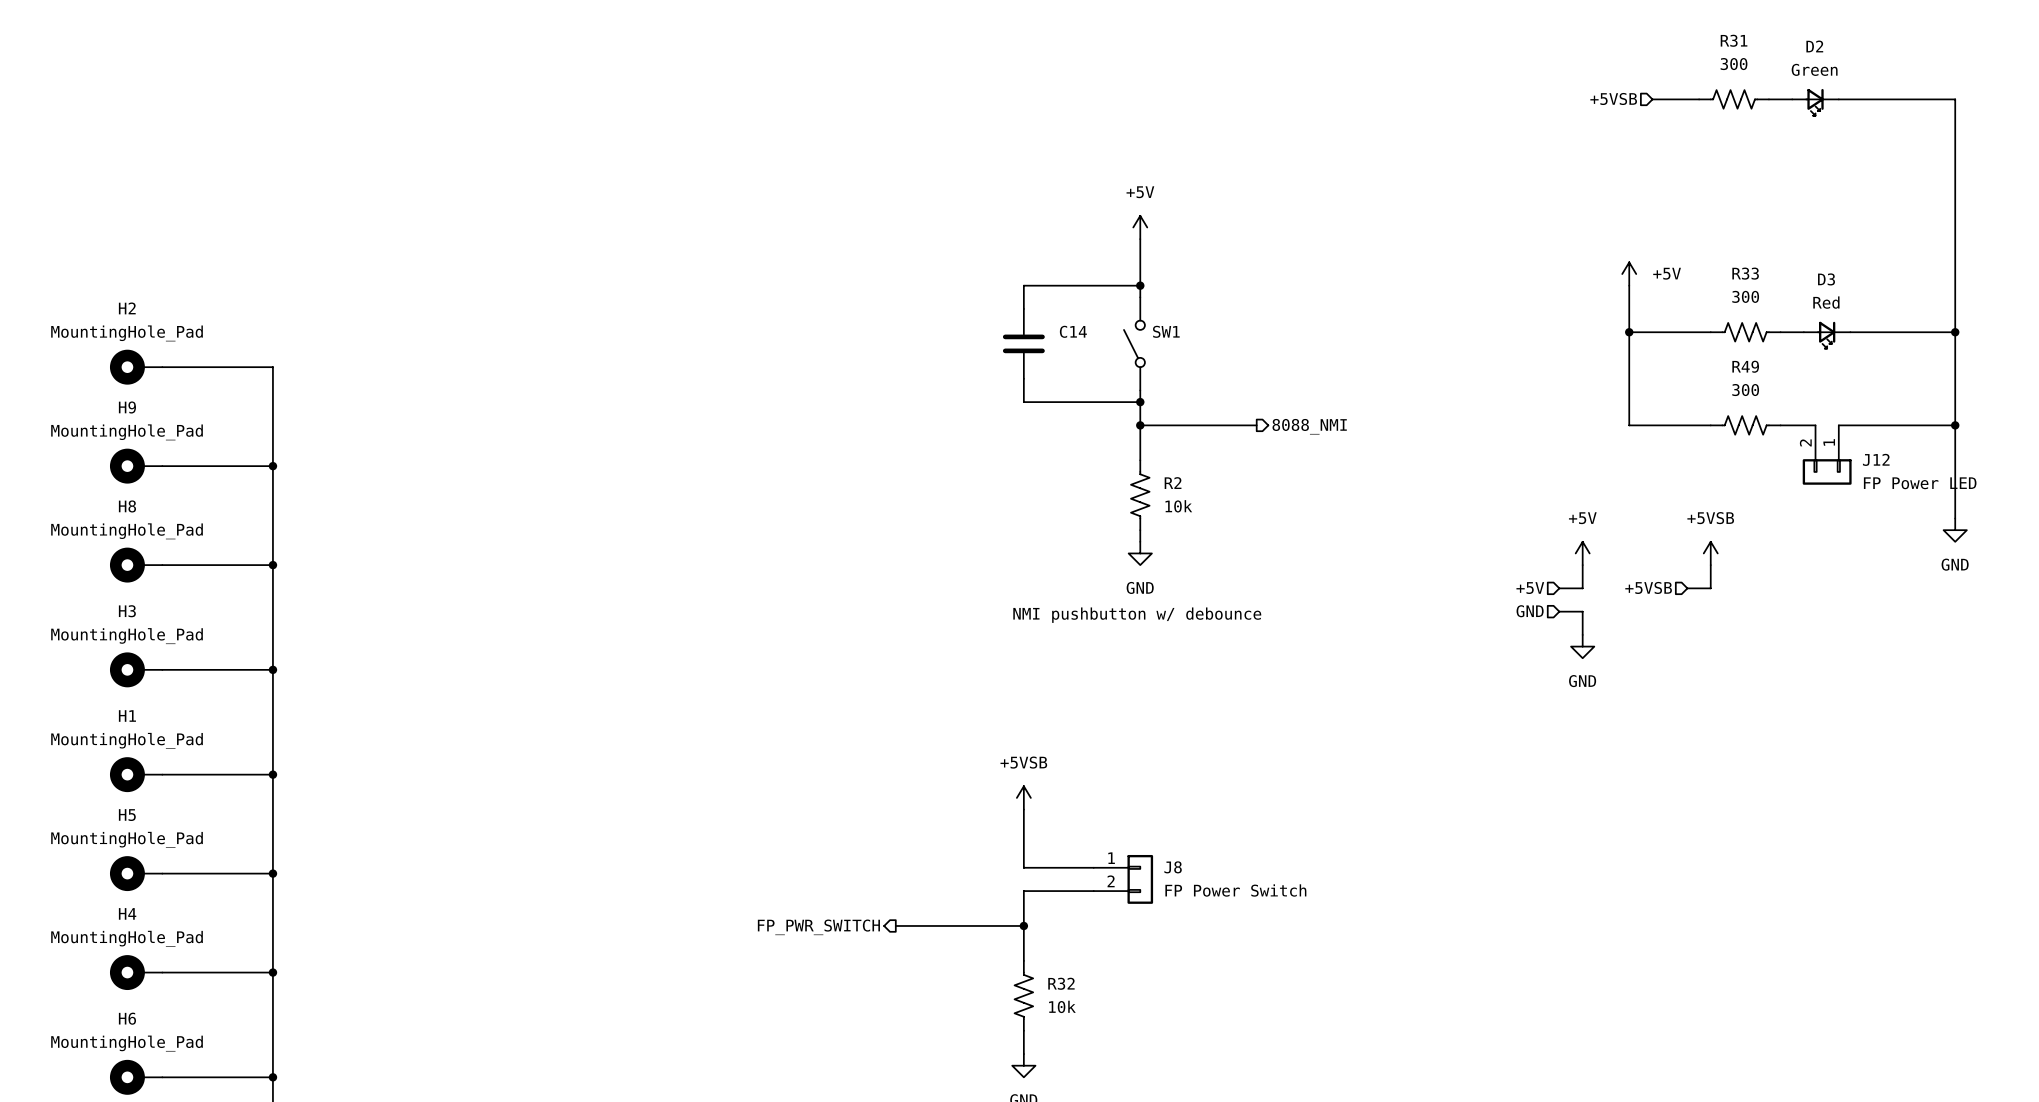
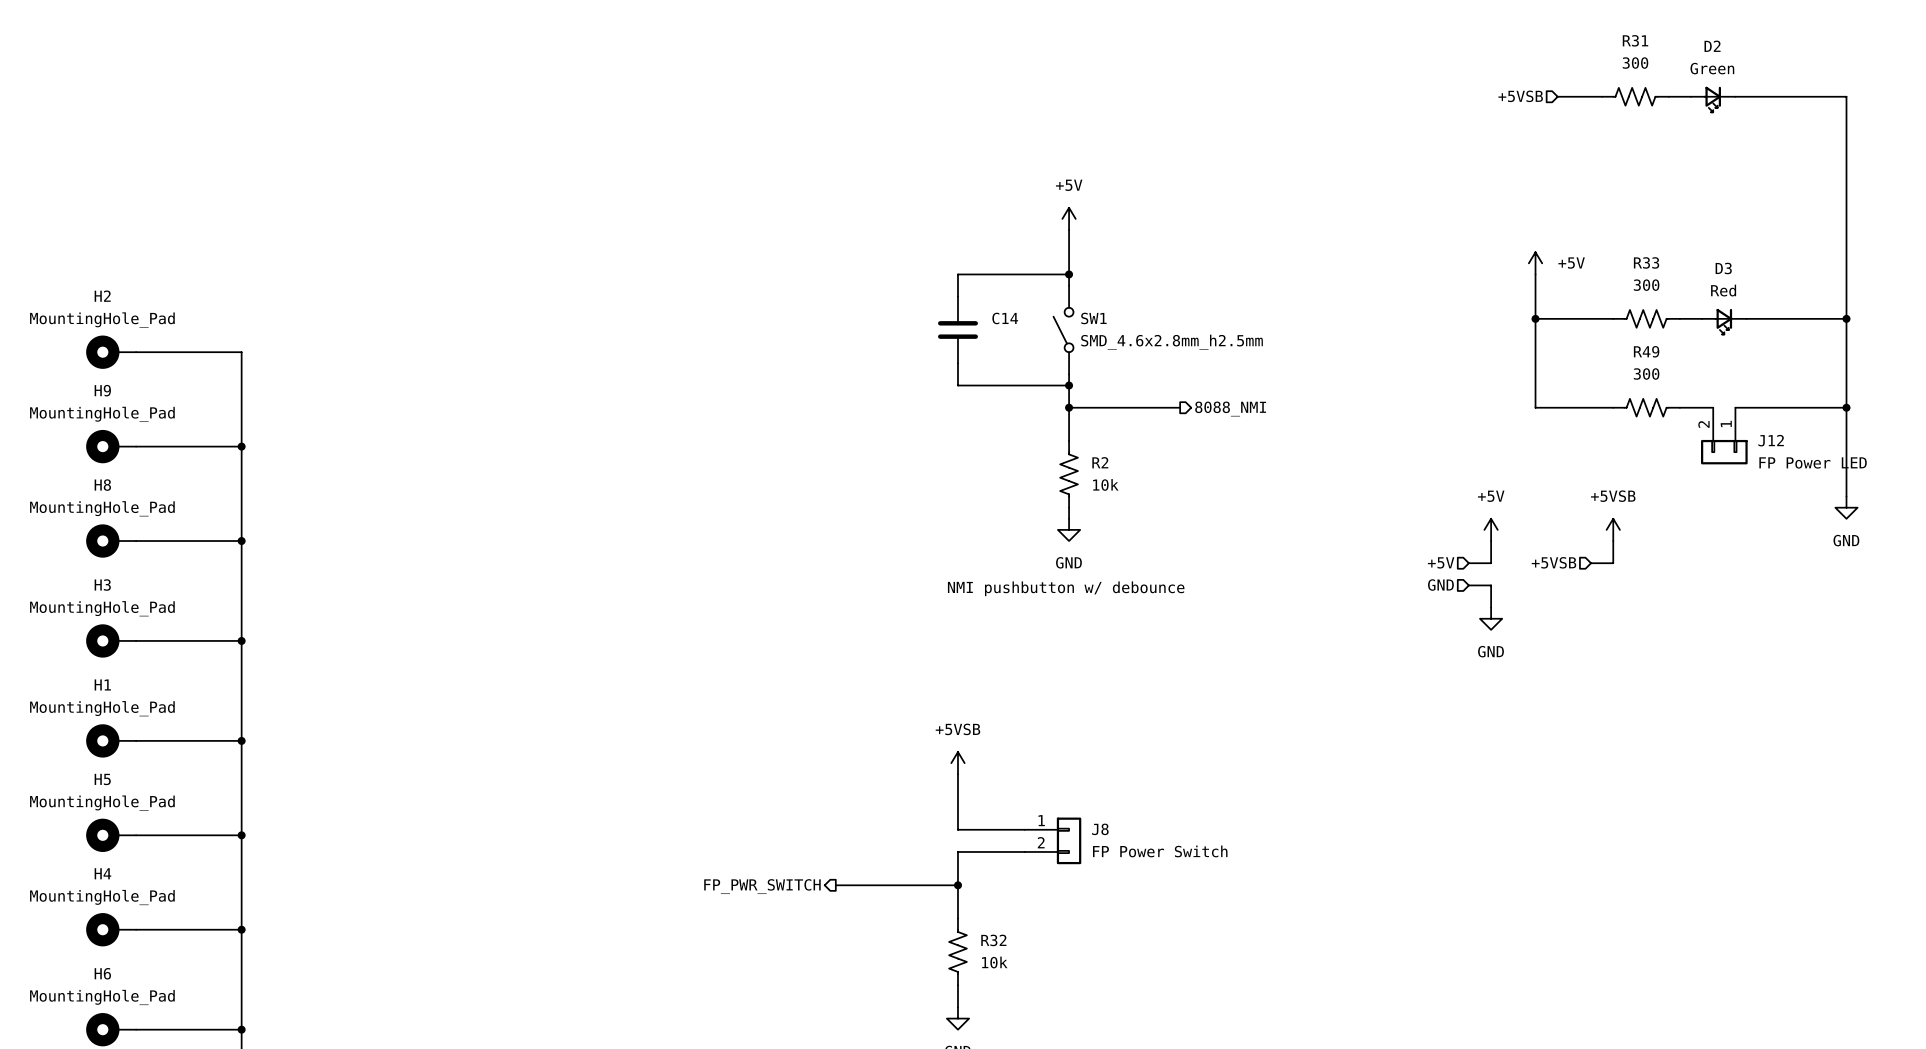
SW1 value: none -> SMD_4.6x2.8mm_h2.5mm (1172, 342)

